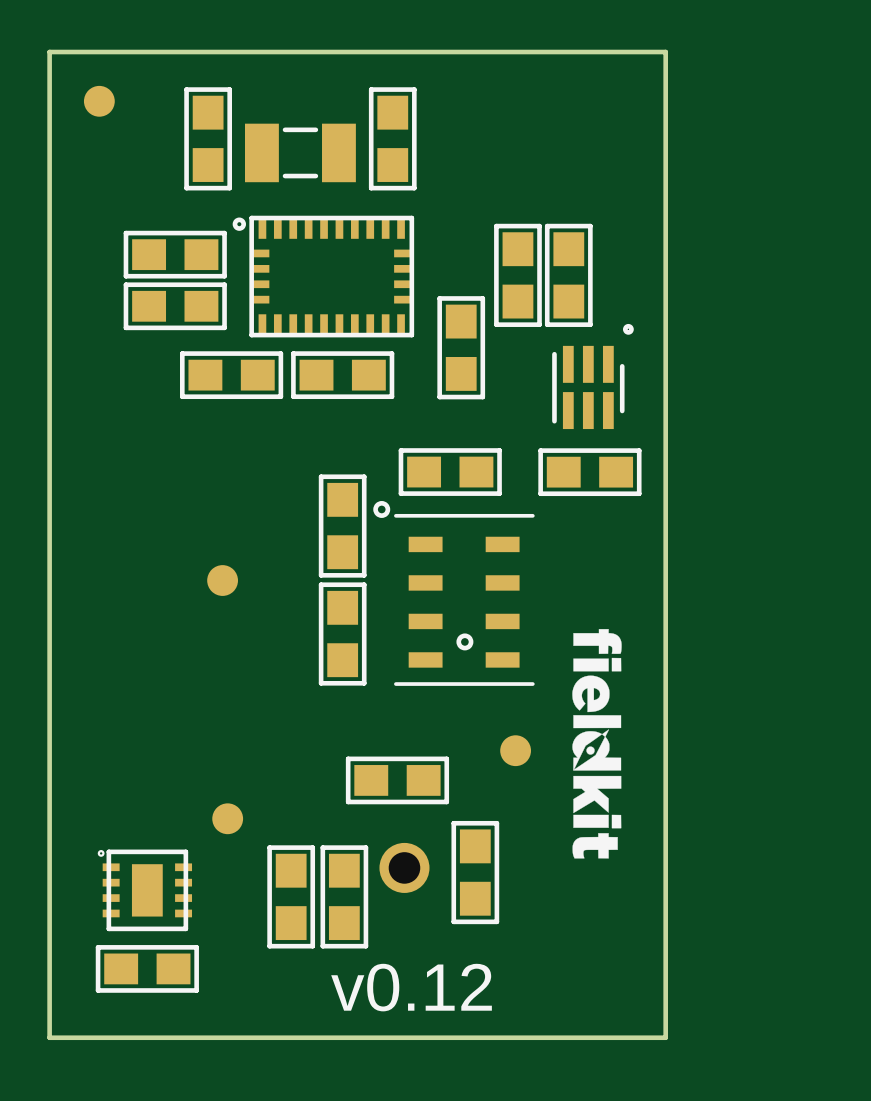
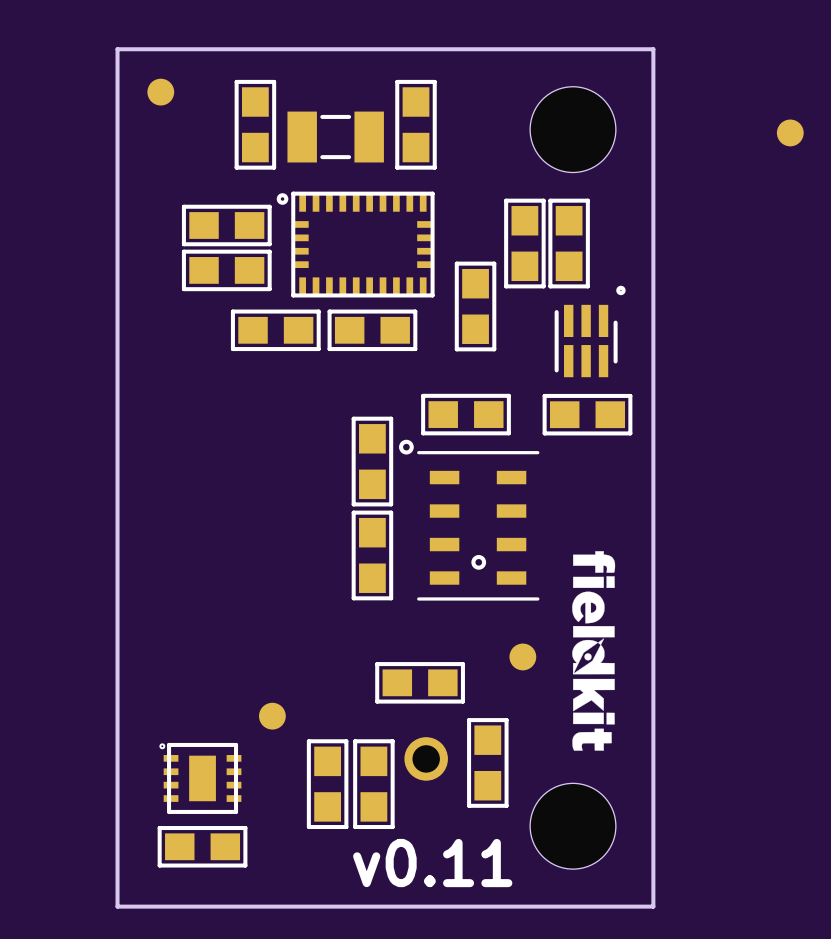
part: none -> (573, 129)
part position: (222, 580) -> (790, 132)
part: none -> (573, 826)
text: v0.12 (411, 987) -> v0.11 (432, 863)

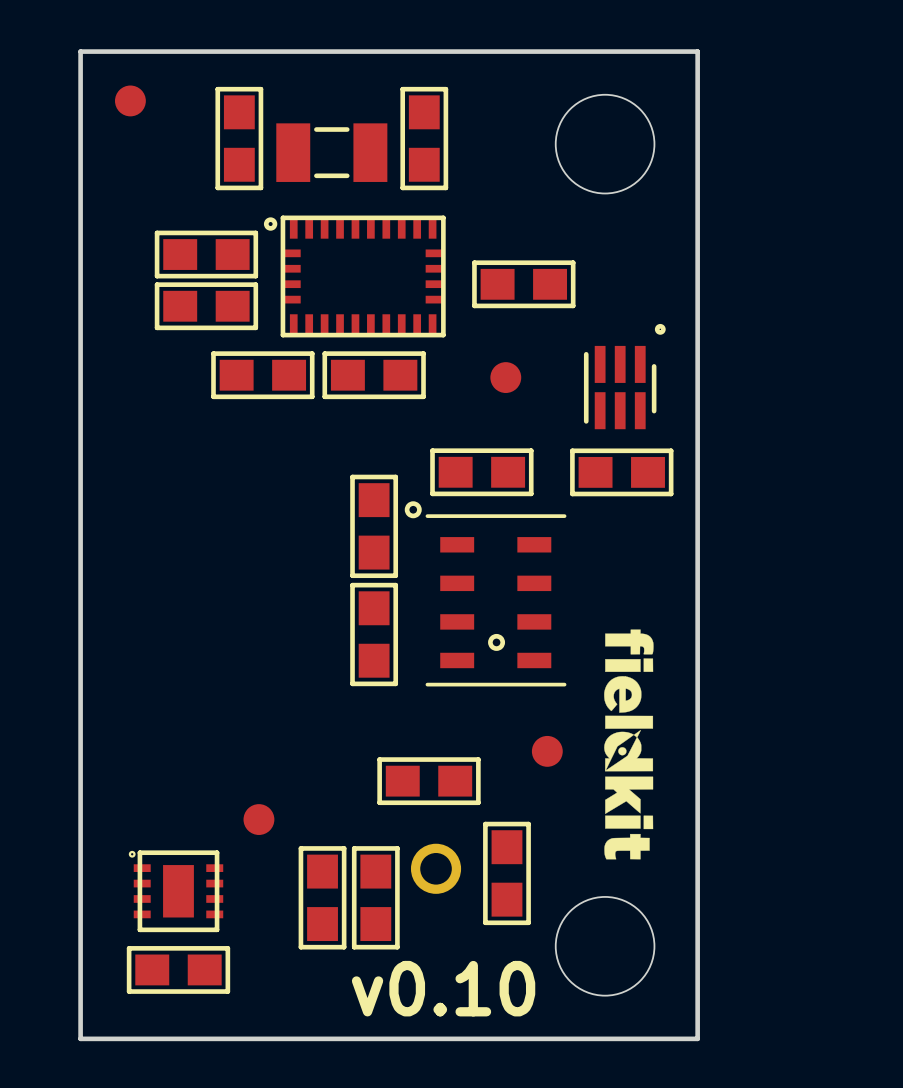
part position: (790, 132) -> (505, 377)
part rotation: 0° (524, 243) -> 90° clockwise (523, 284)
part: (569, 243) -> none
part: (475, 306) -> none
text: v0.11 (432, 863) -> v0.10 (443, 988)

